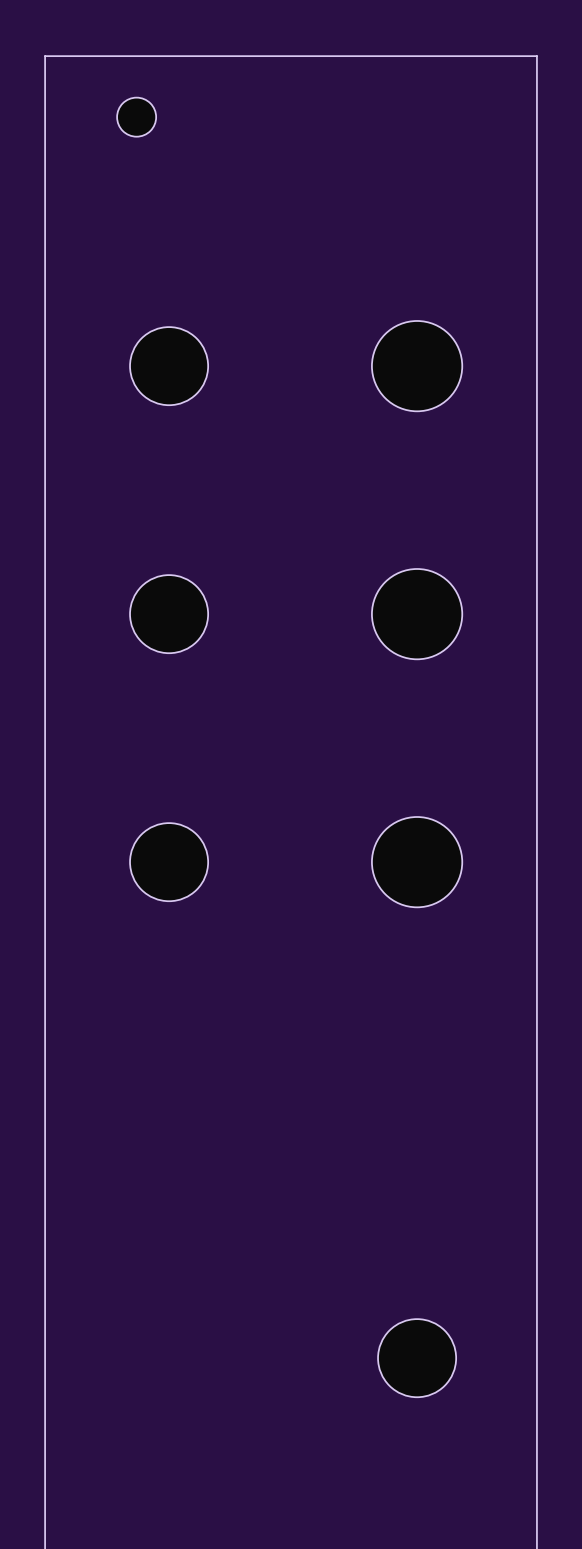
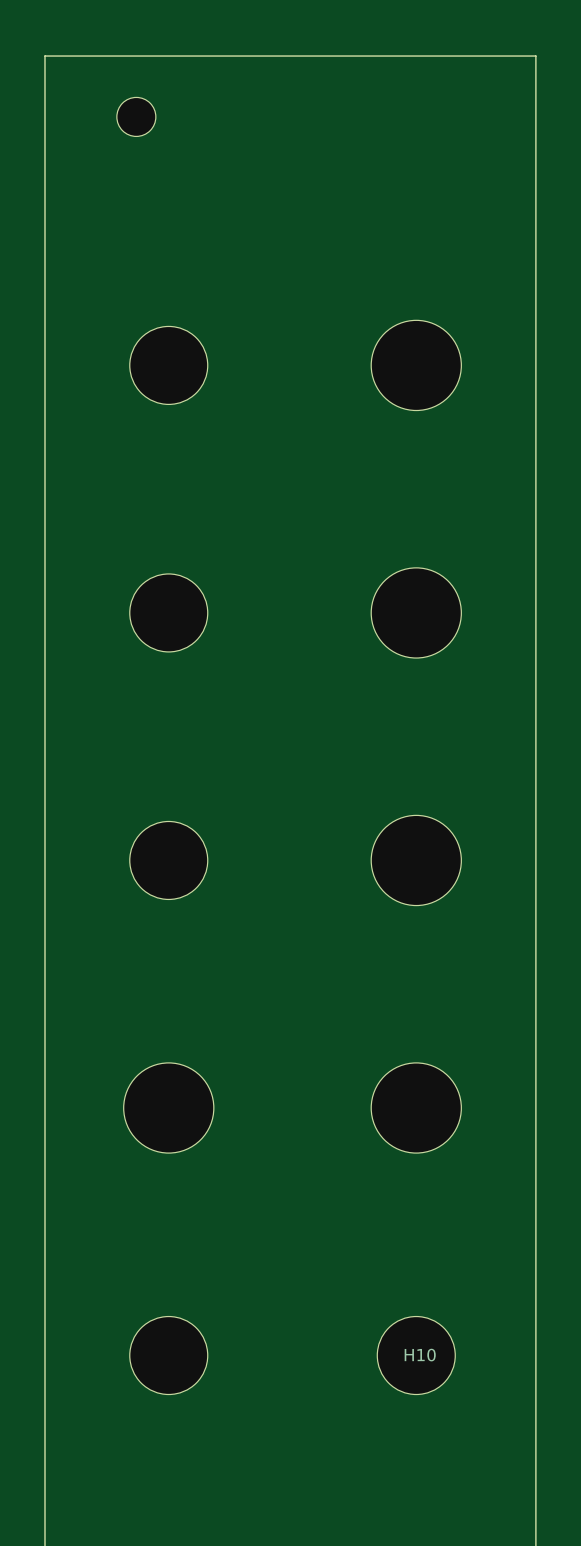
part: none -> (168, 1107)
part: none -> (416, 1107)
H10 name: none -> H10 (420, 1355)
part: none -> (168, 1355)

